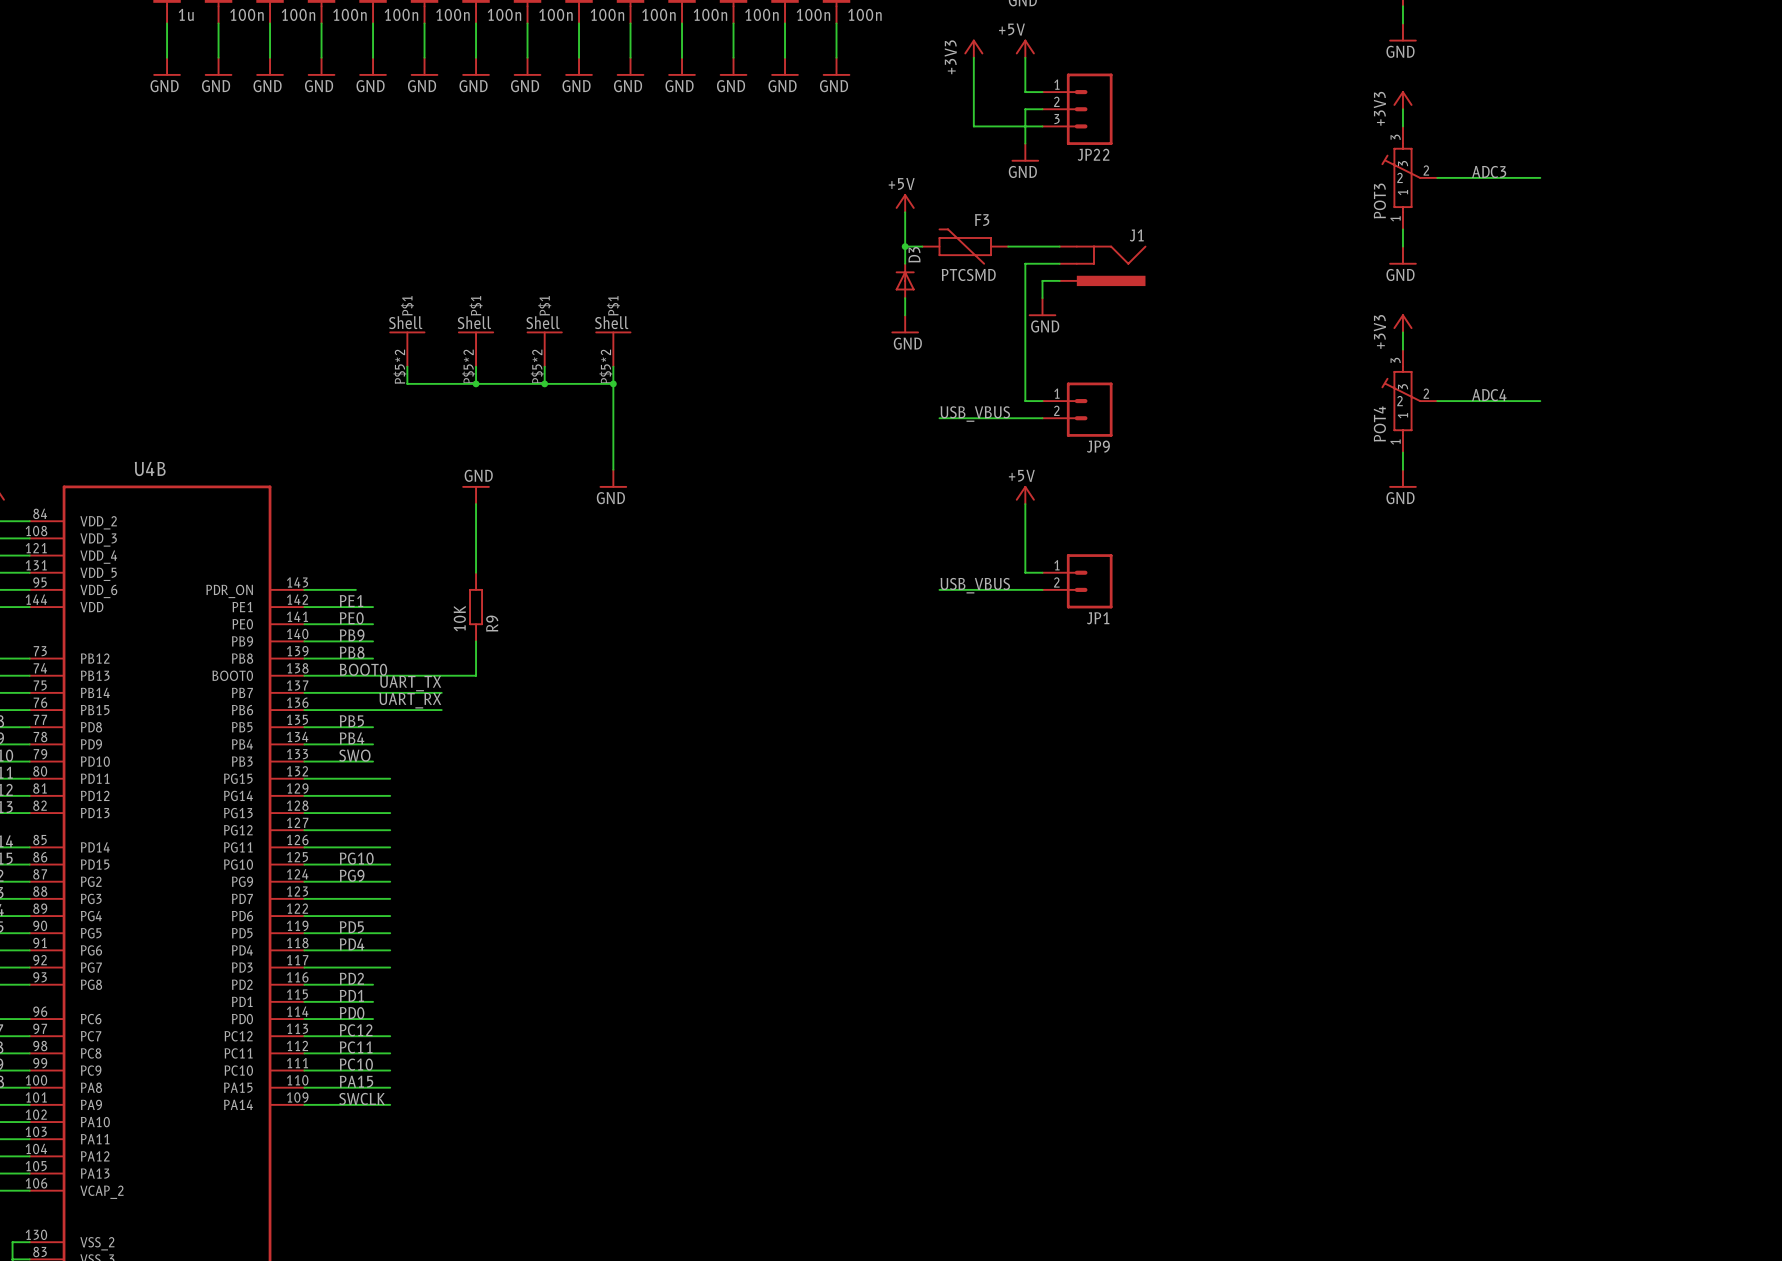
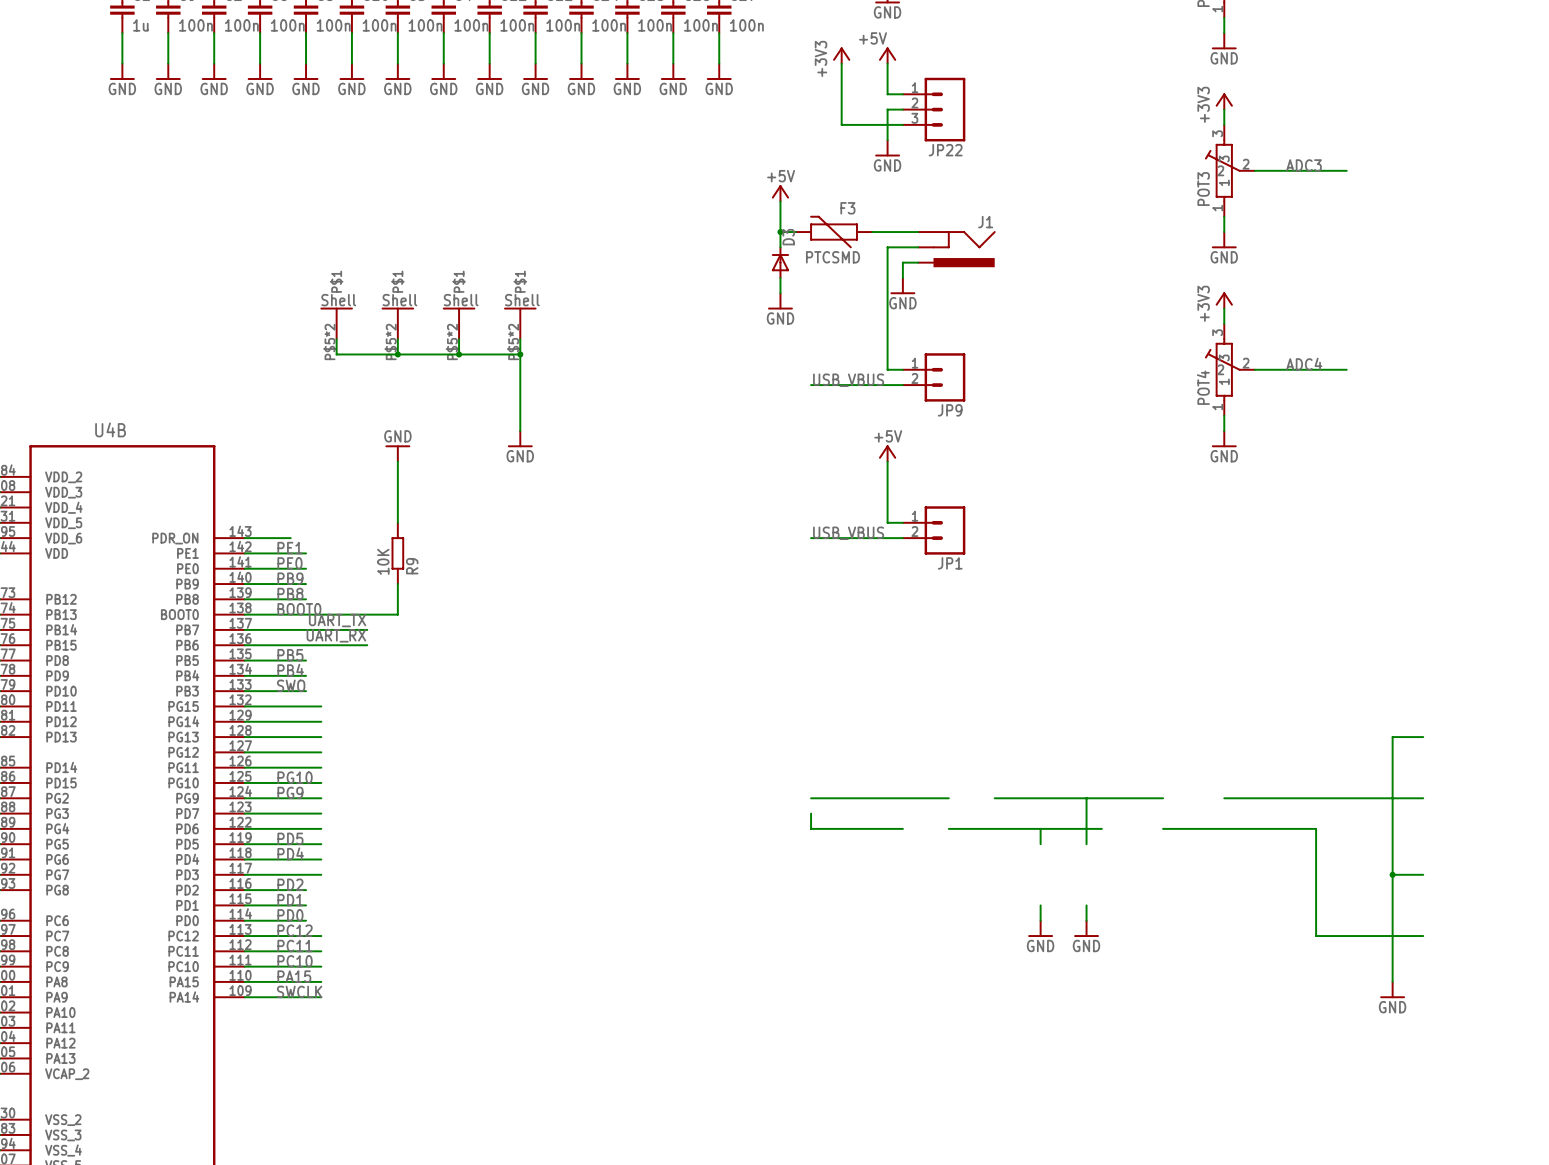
wire: none -> (1423, 737) (1392, 737) (1392, 981)
wire: none -> (811, 798) (948, 798)
wire: none -> (994, 798) (1163, 798)
wire: none -> (1086, 798) (1086, 844)
wire: none -> (1224, 798) (1423, 798)
wire: none -> (811, 813) (811, 828) (902, 828)
wire: none -> (948, 828) (1101, 828)
wire: none -> (1040, 828) (1040, 844)
wire: none -> (1163, 828) (1316, 828) (1316, 936) (1423, 936)
wire: none -> (1392, 874) (1423, 874)
junction: none -> (1392, 874)
wire: none -> (1040, 905) (1040, 920)
wire: none -> (1086, 905) (1086, 920)
power symbol: none -> GND (1040, 928)
power symbol: none -> GND (1086, 928)
power symbol: none -> GND (1392, 989)

